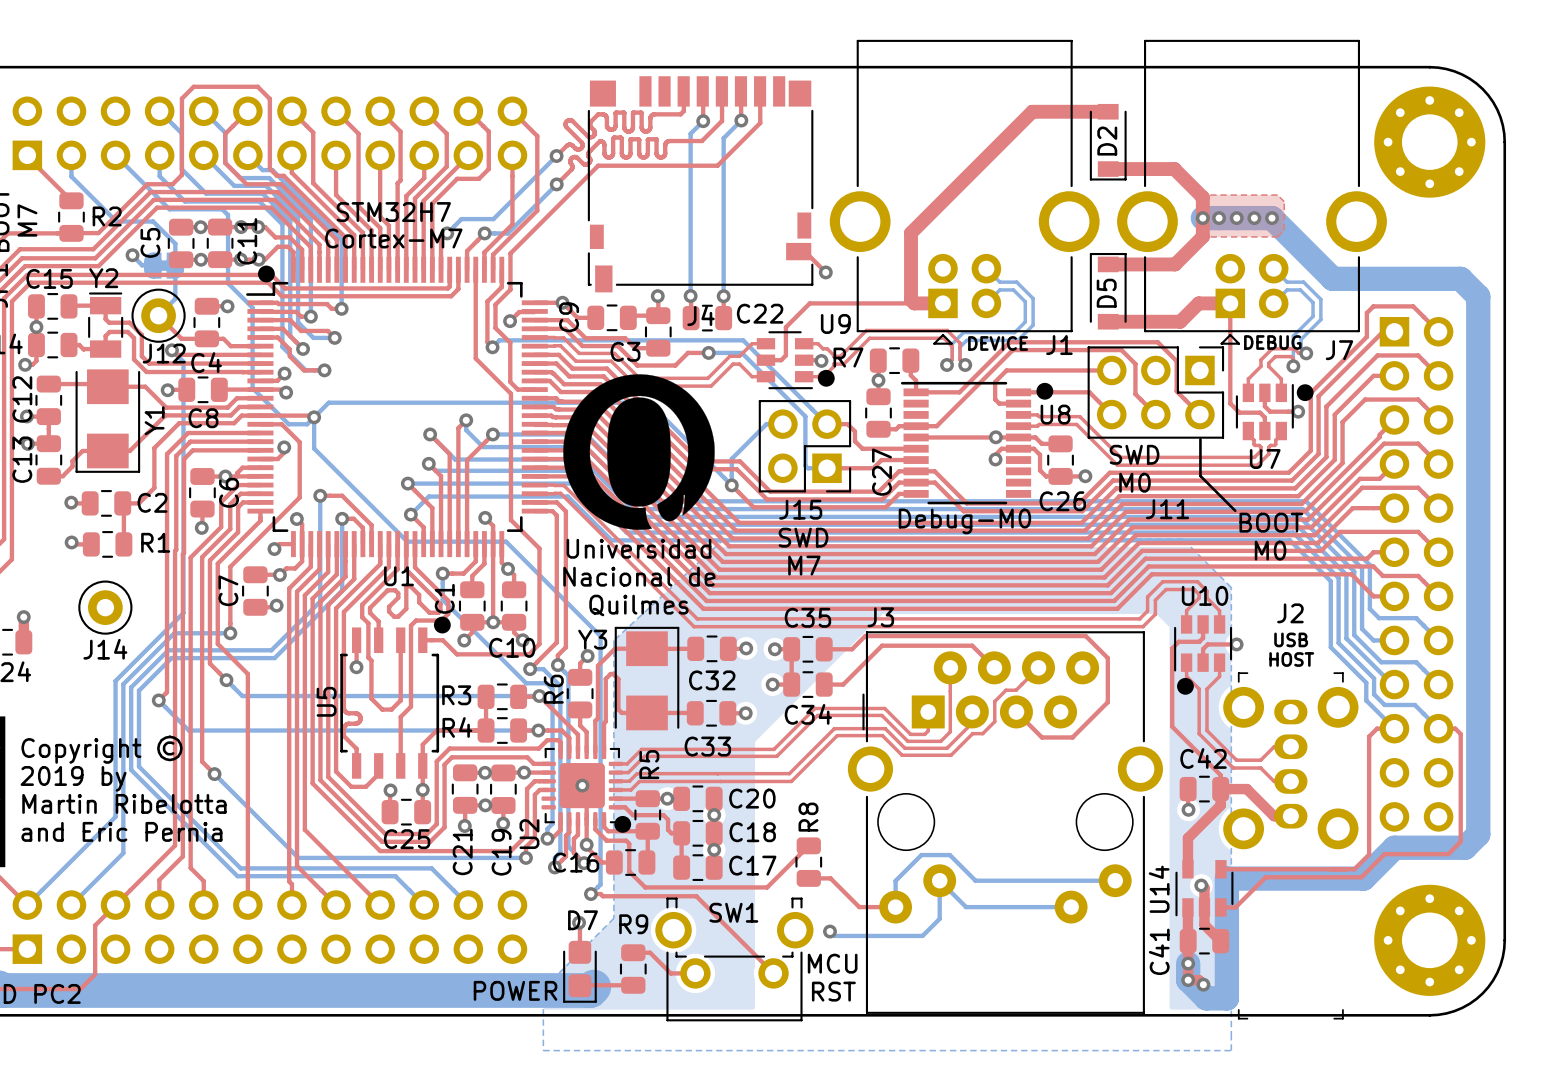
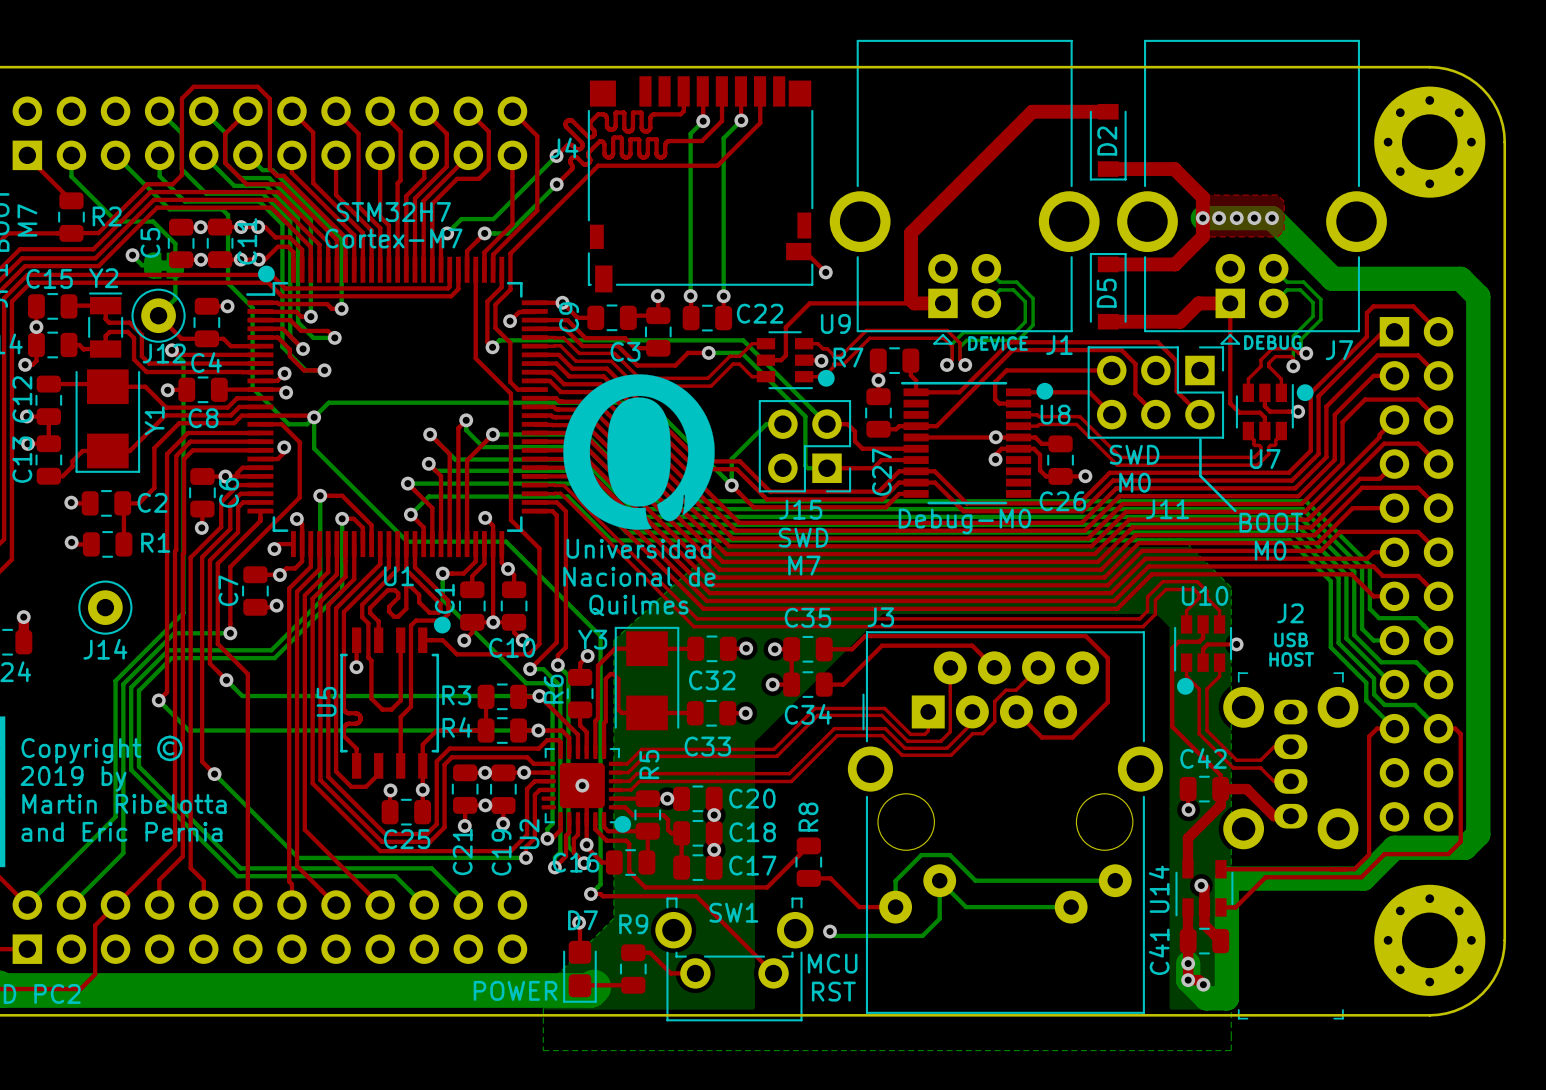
J4 name position: J4 (701, 315) -> J4 (564, 147)

